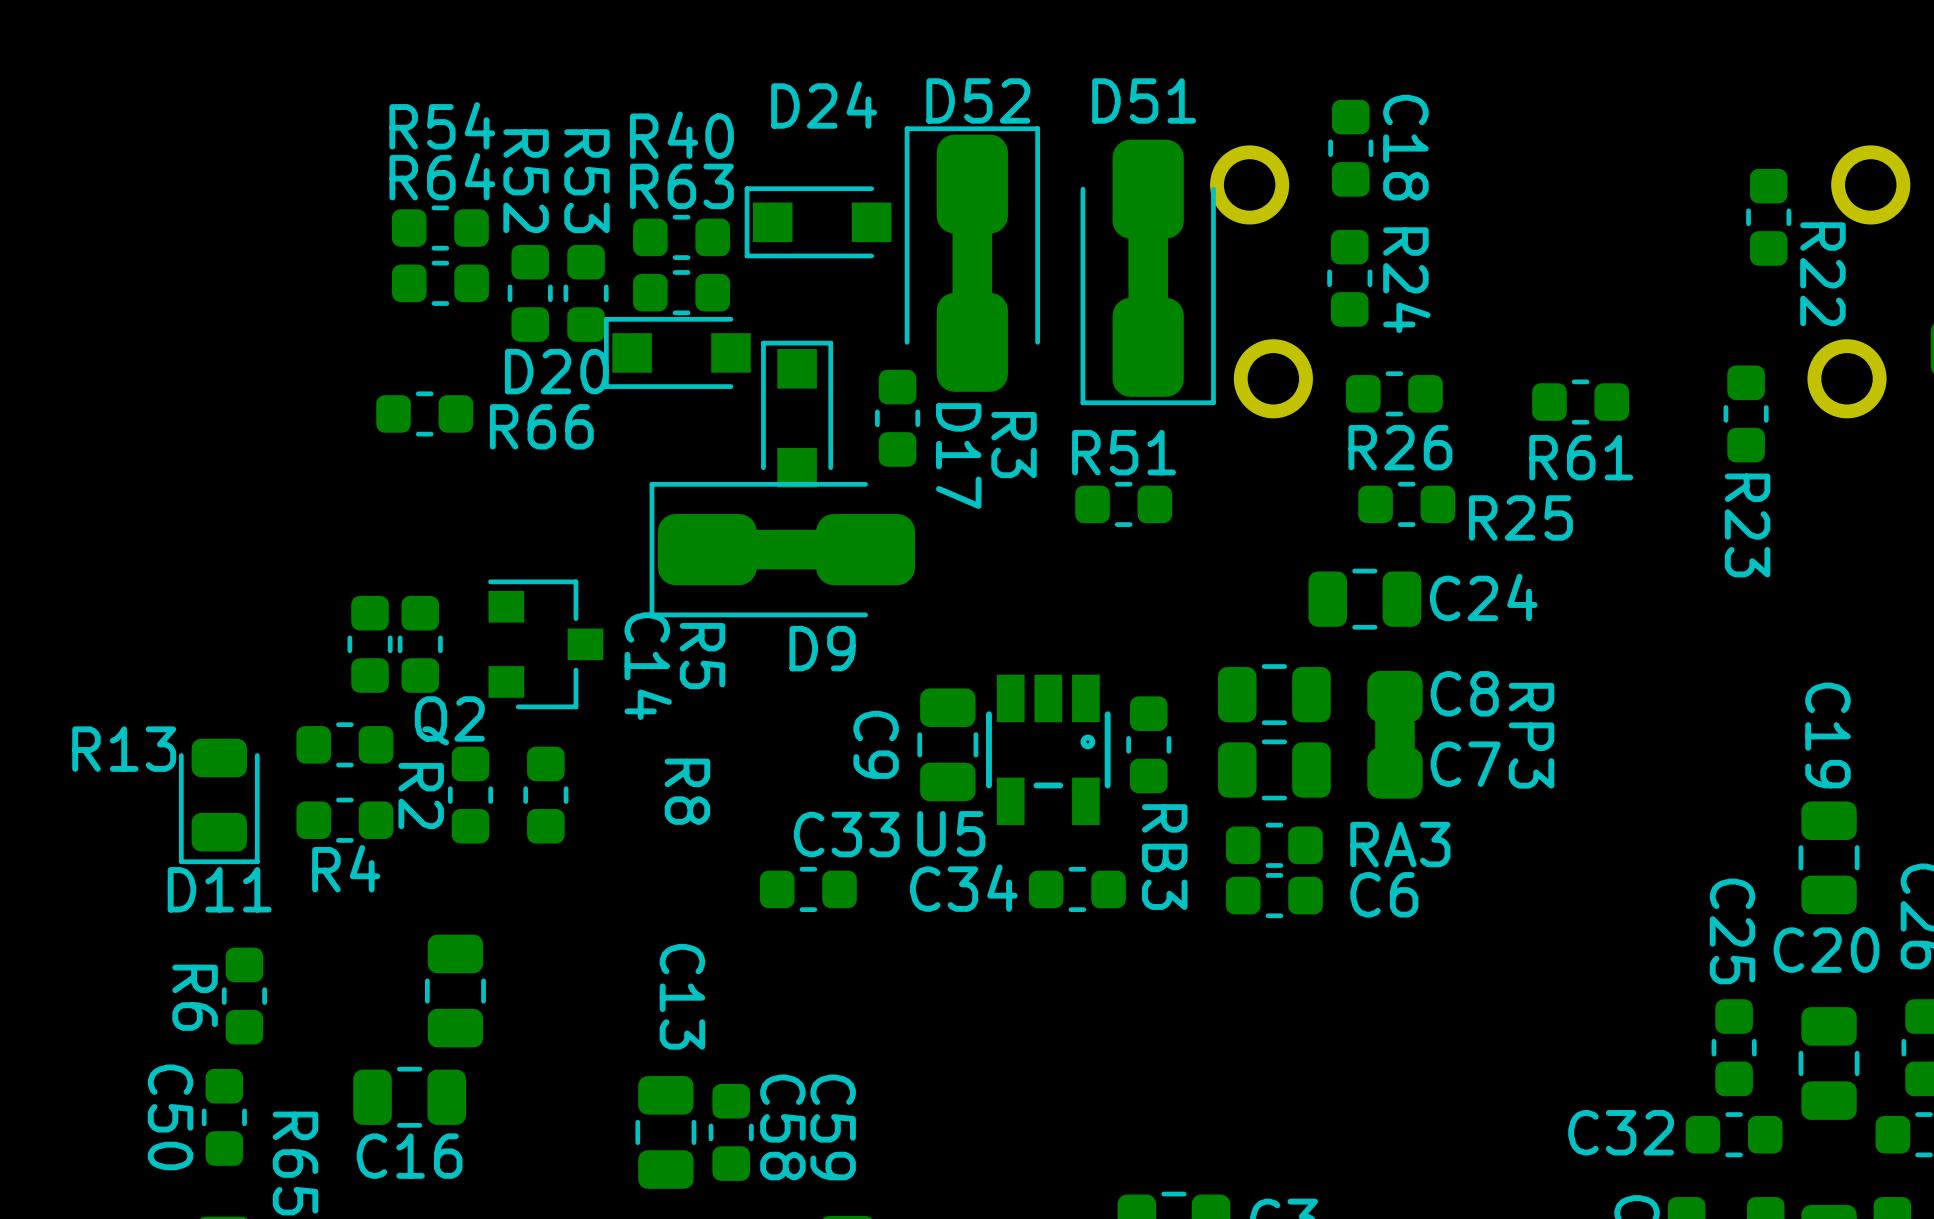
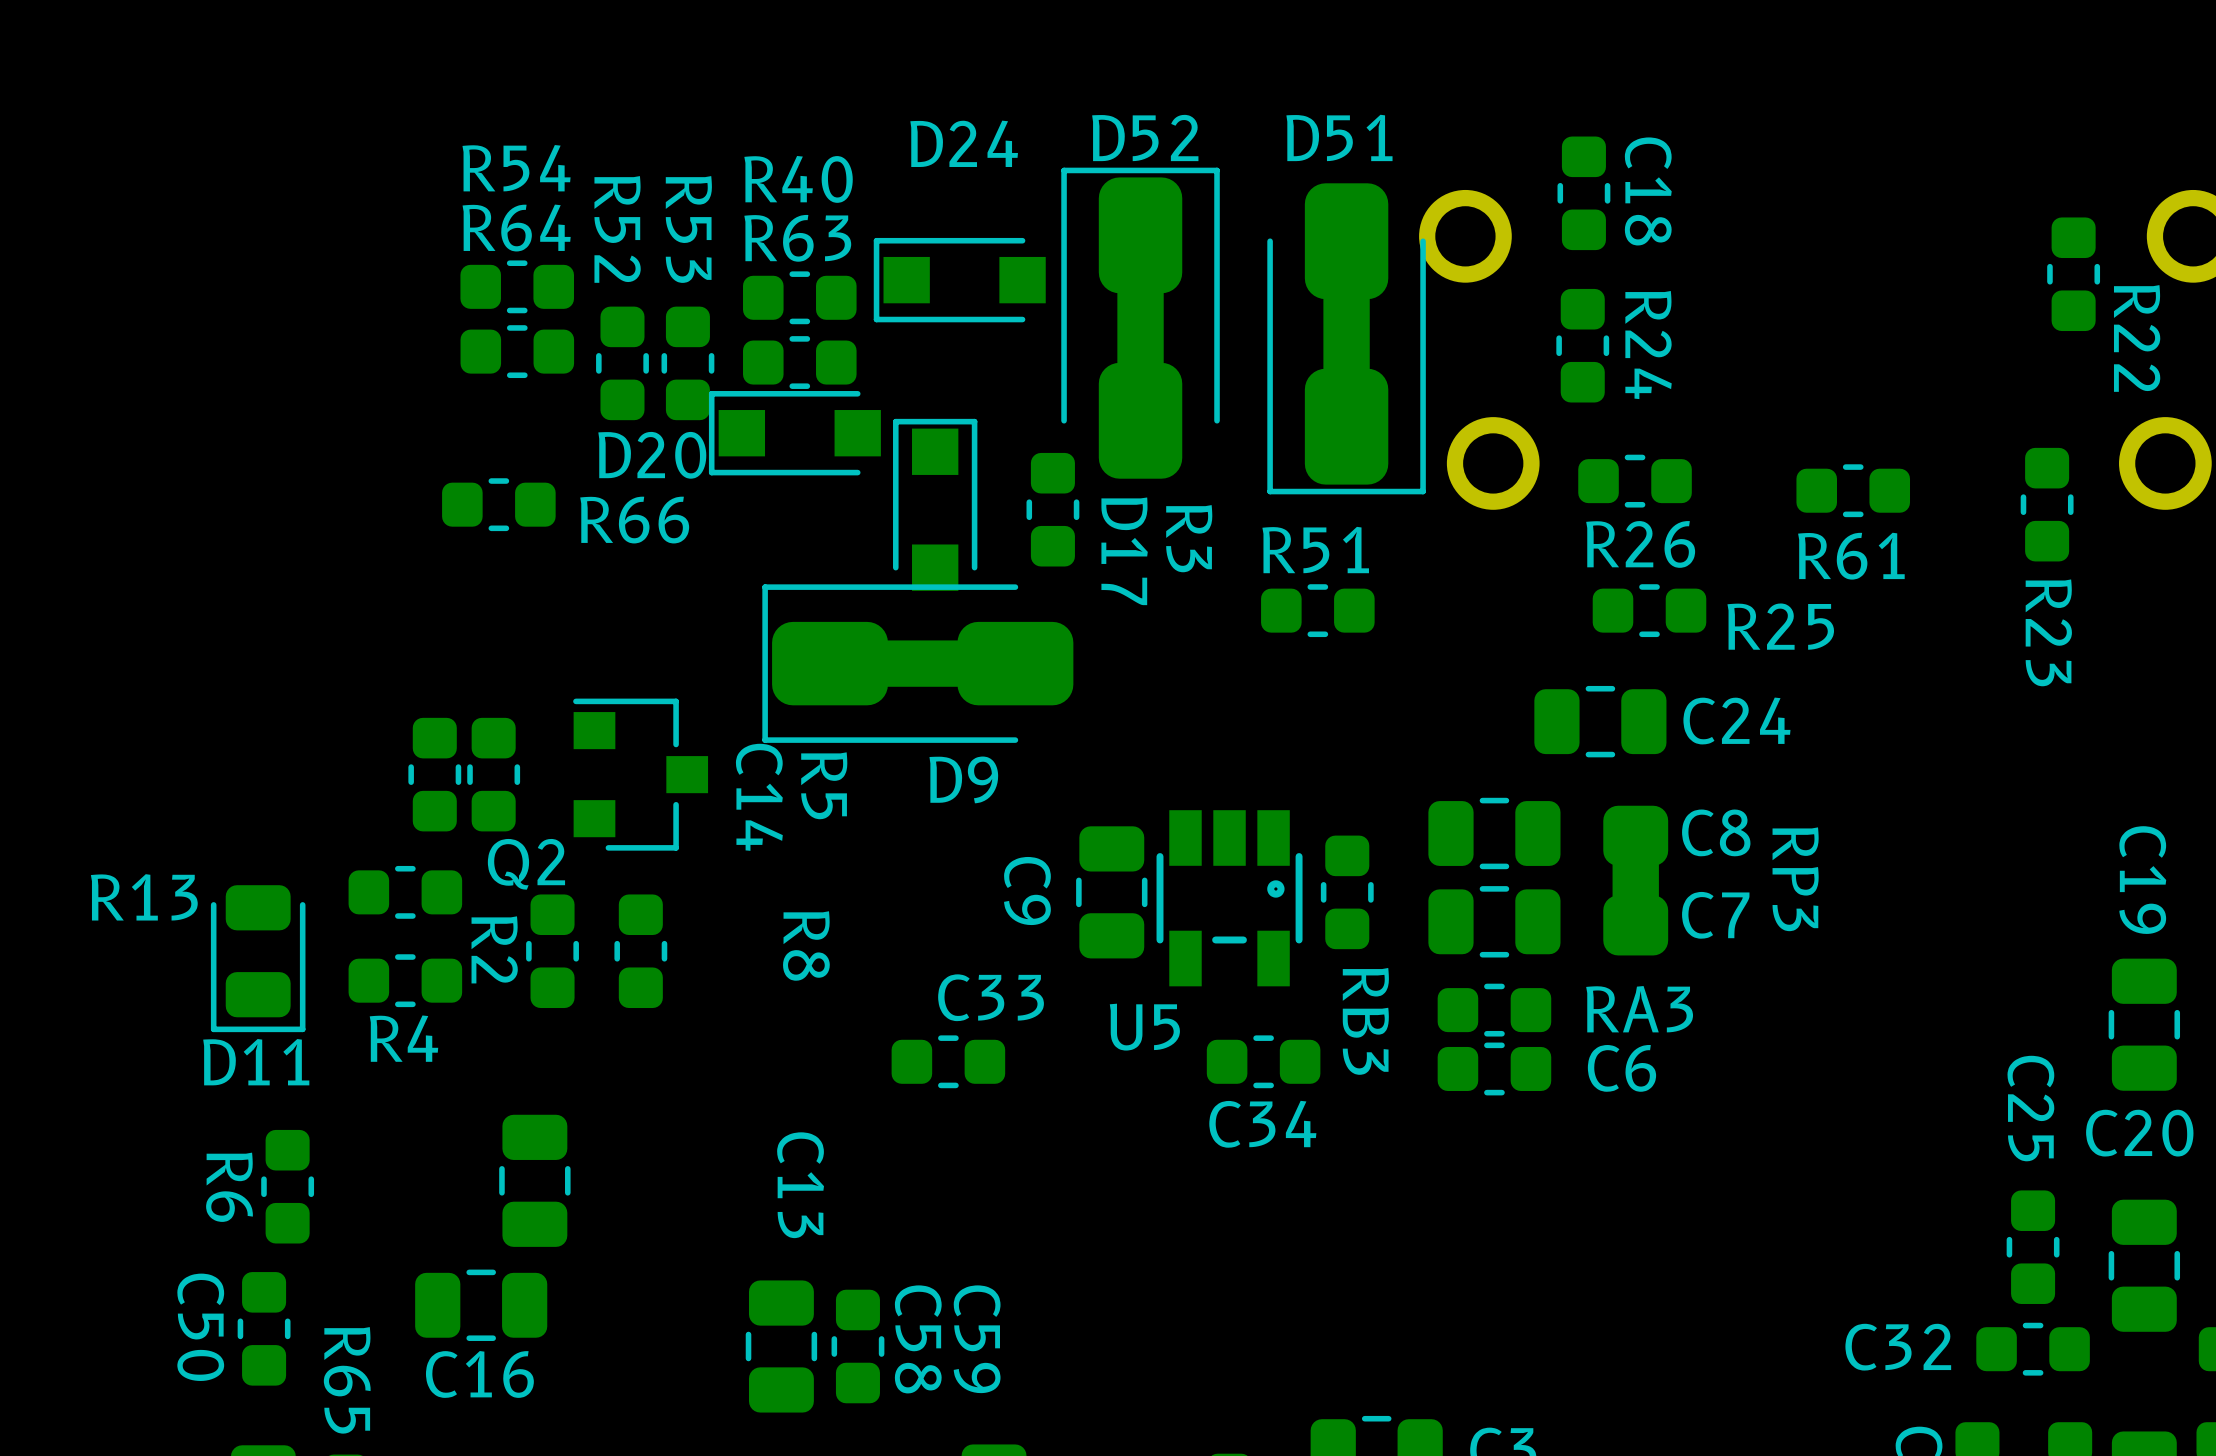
U5 name position: U5 (951, 833) -> U5 (1144, 1027)
C34 name position: C34 (963, 888) -> C34 (1262, 1124)

